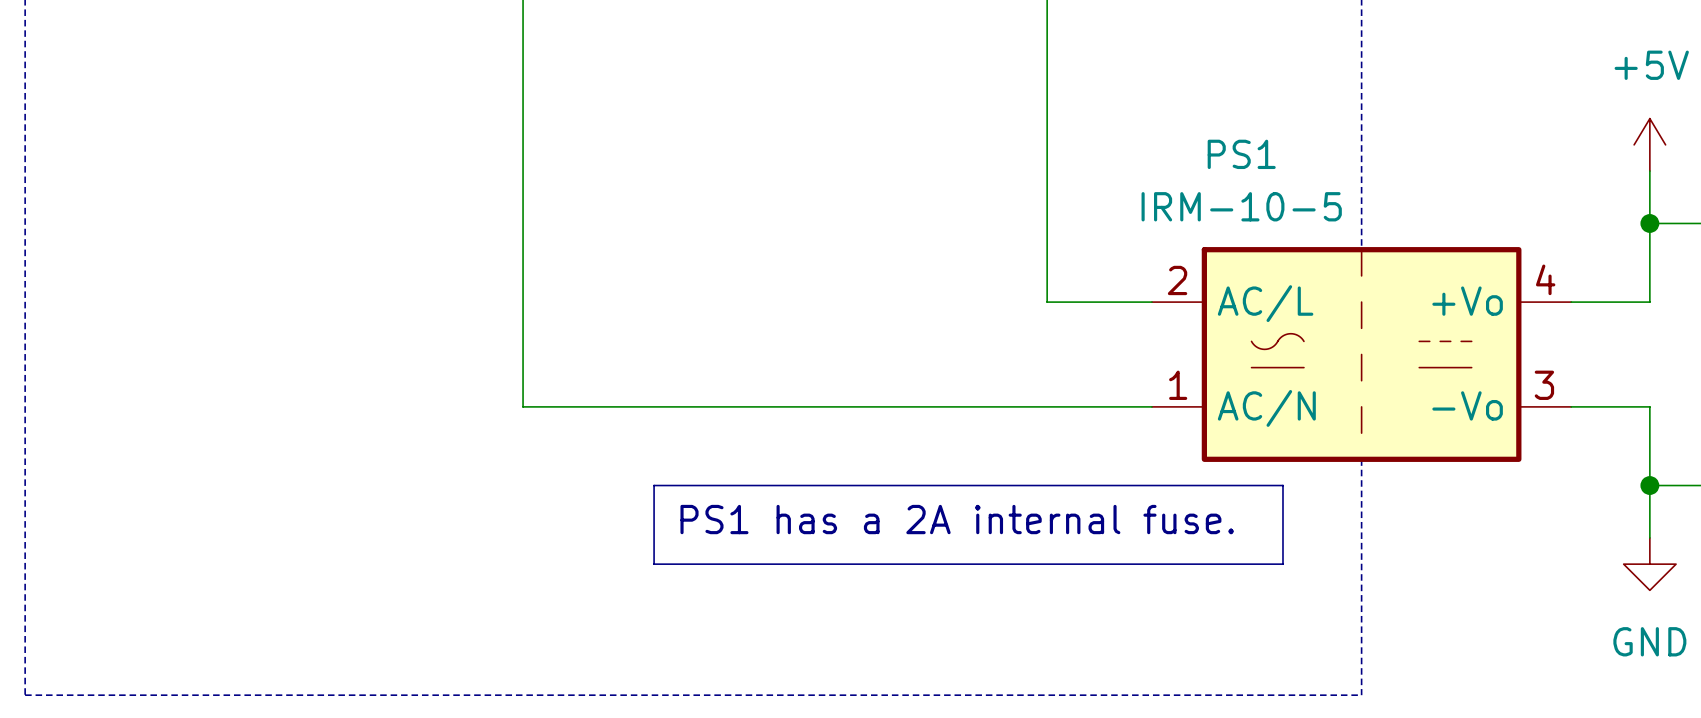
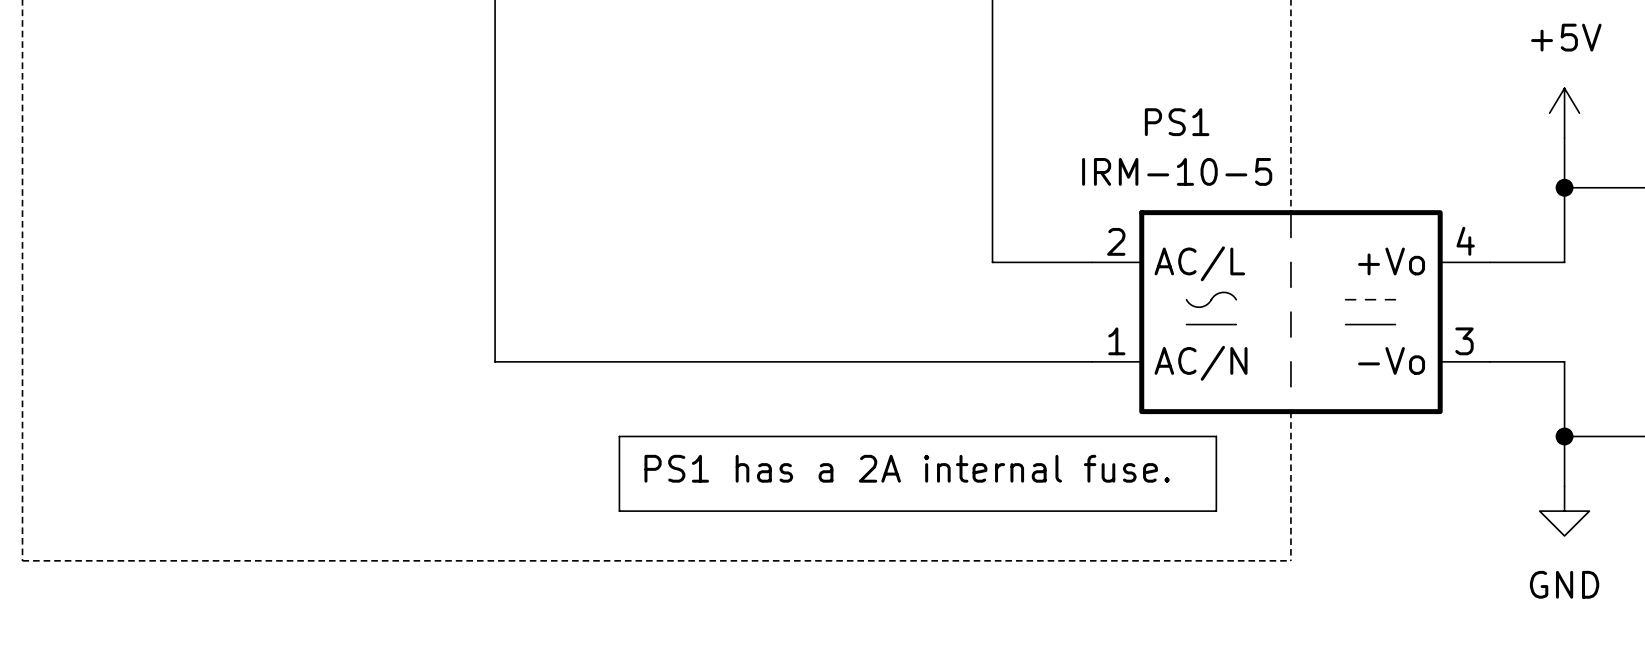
line: (25, 616) (25, 695) (1361, 695) (1361, 616) -> (22, 560) (1290, 560)

